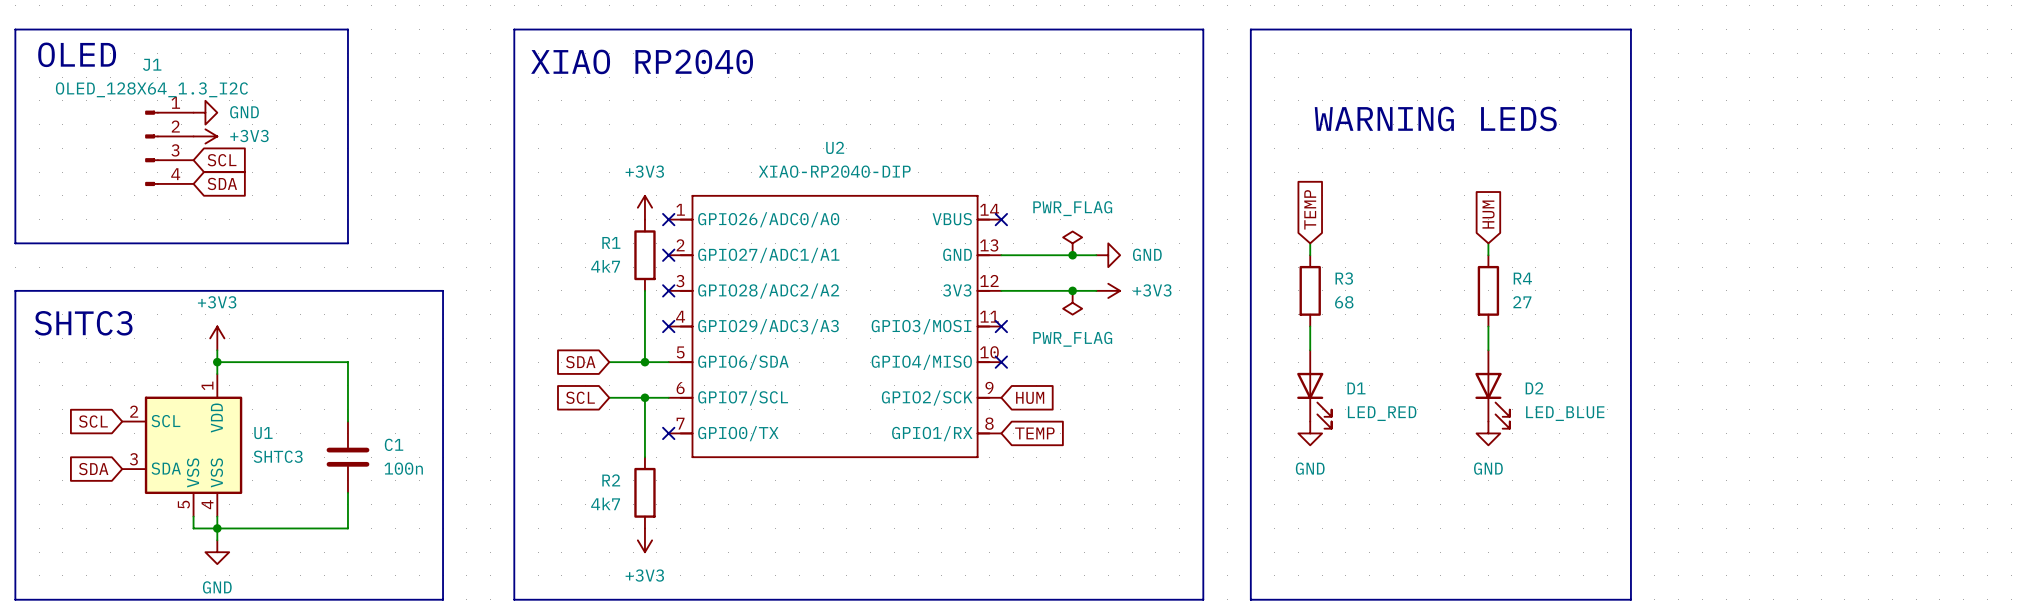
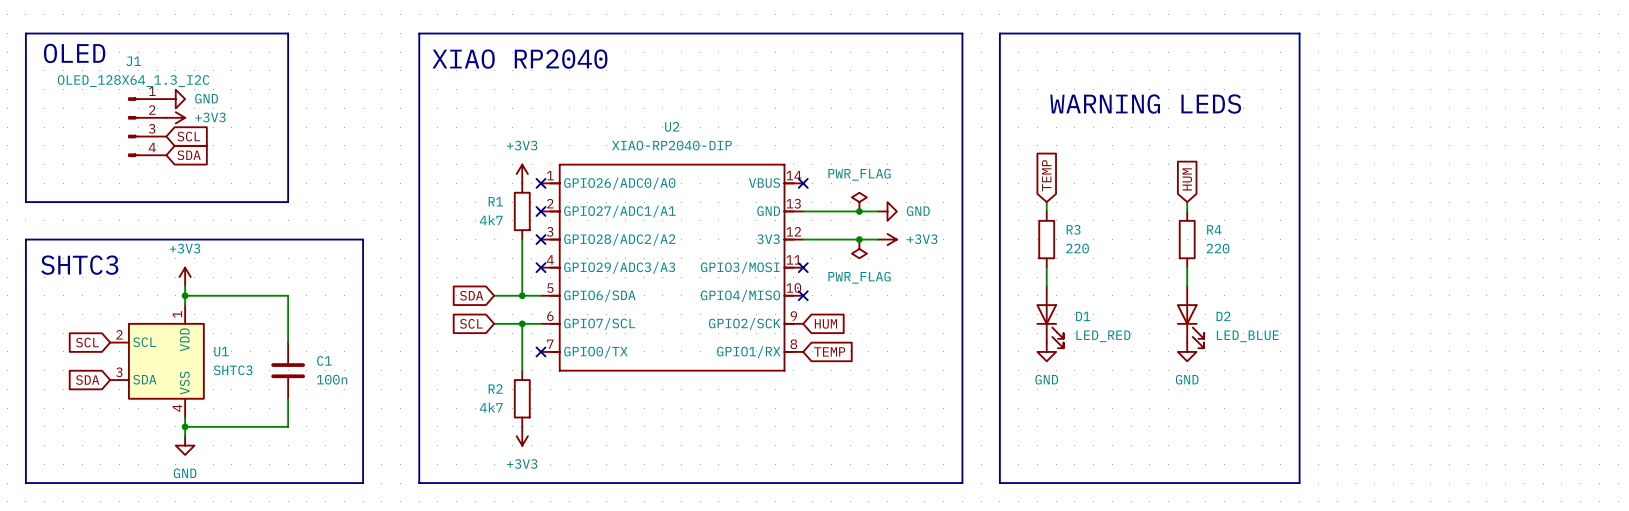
R3 value: 68 (1344, 302) -> 220 (1077, 248)
R4 value: 27 (1522, 302) -> 220 (1218, 248)
U1 symbol: [122, 374, 243, 517] -> [110, 305, 205, 418]
wire: (193, 516) (193, 528) (217, 528) -> none

